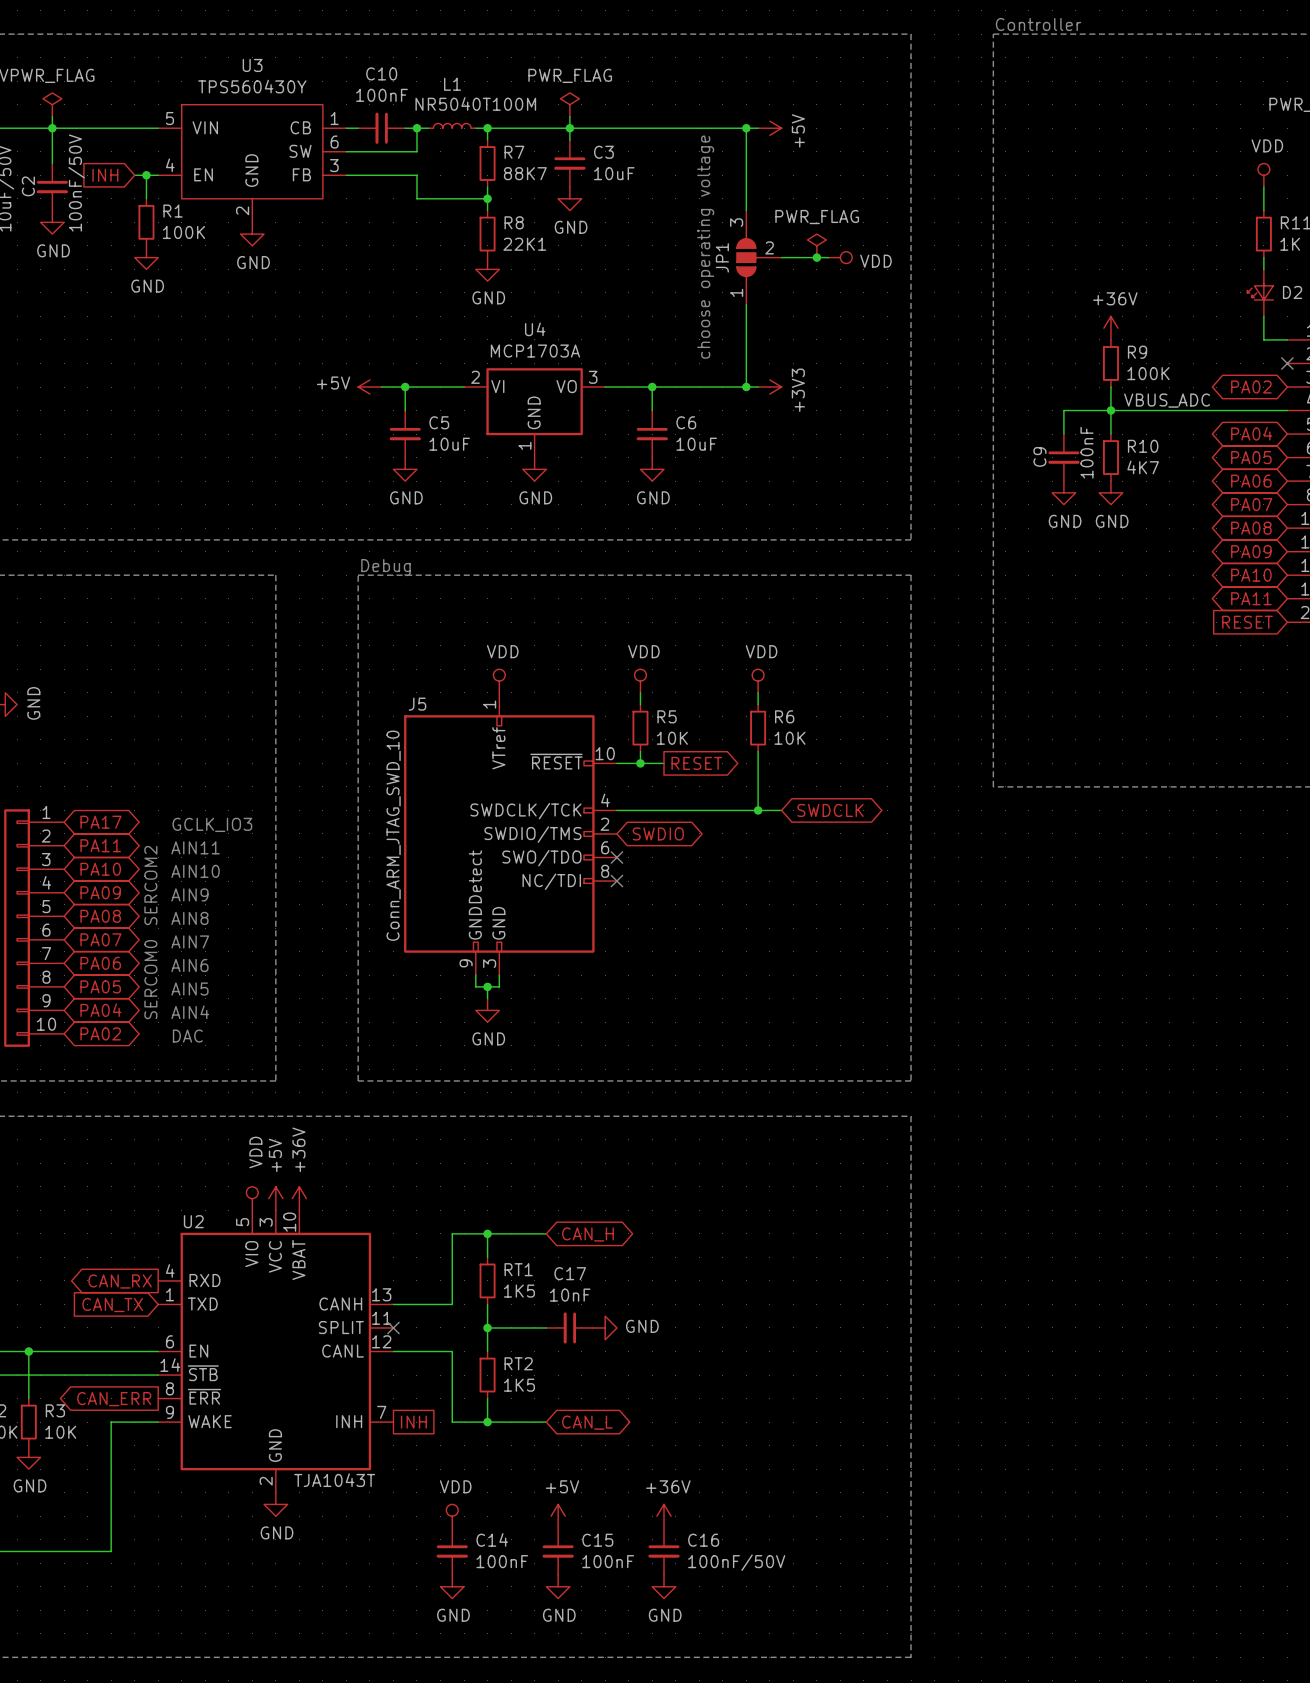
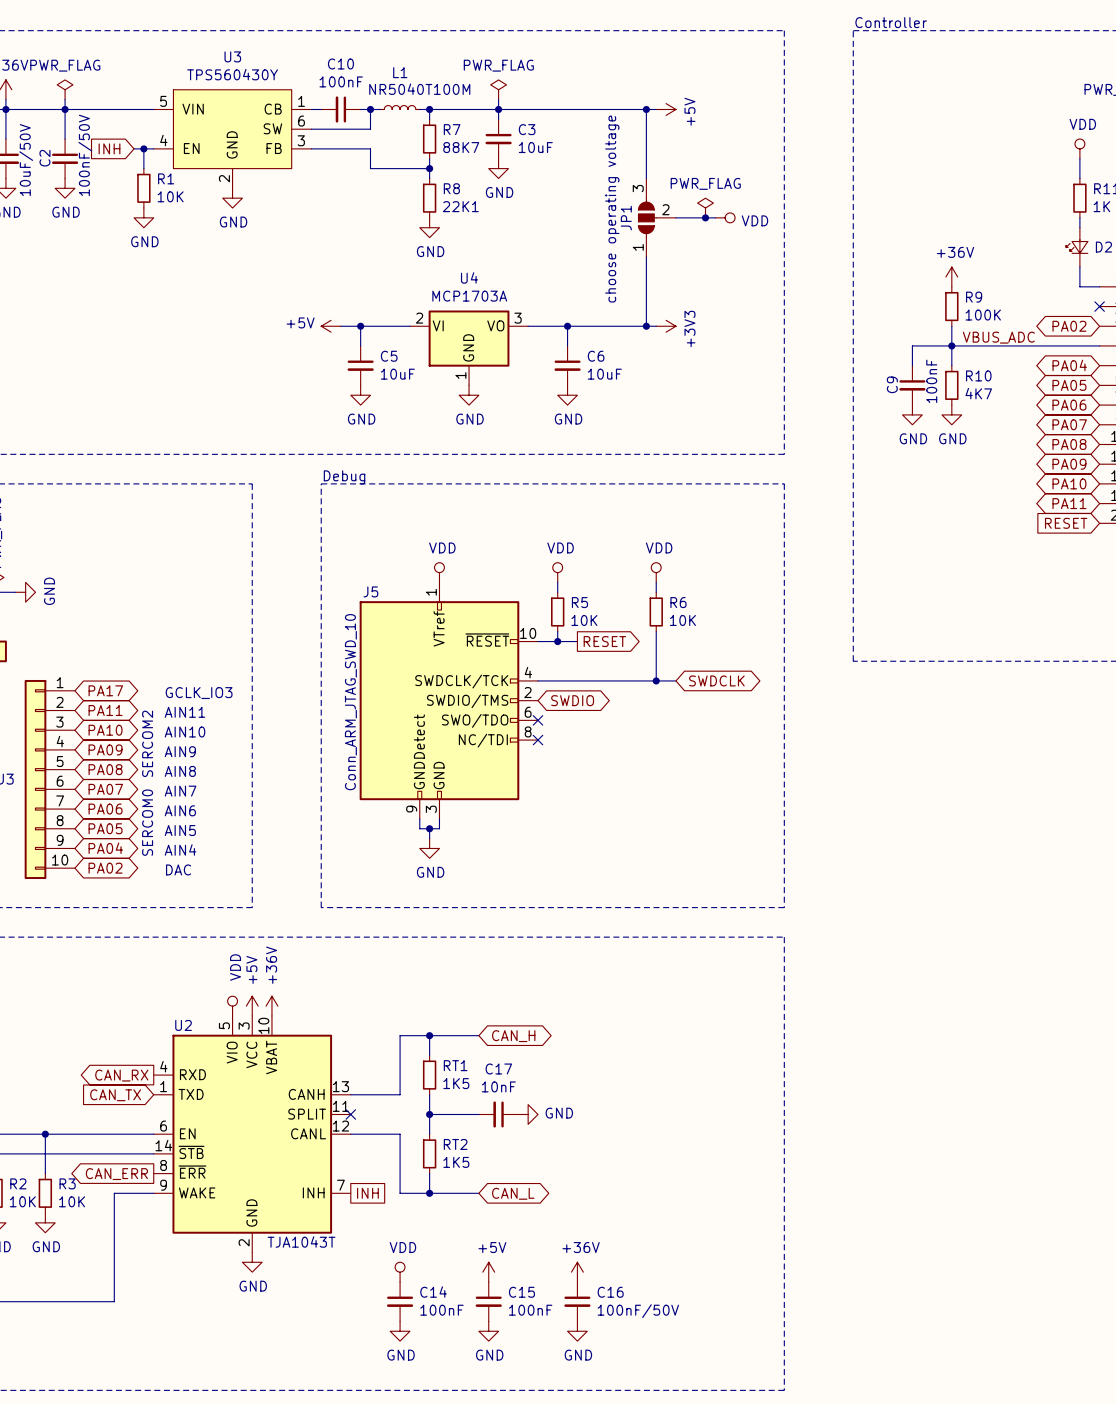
R1 value: 100K (183, 232) -> 10K (170, 196)

